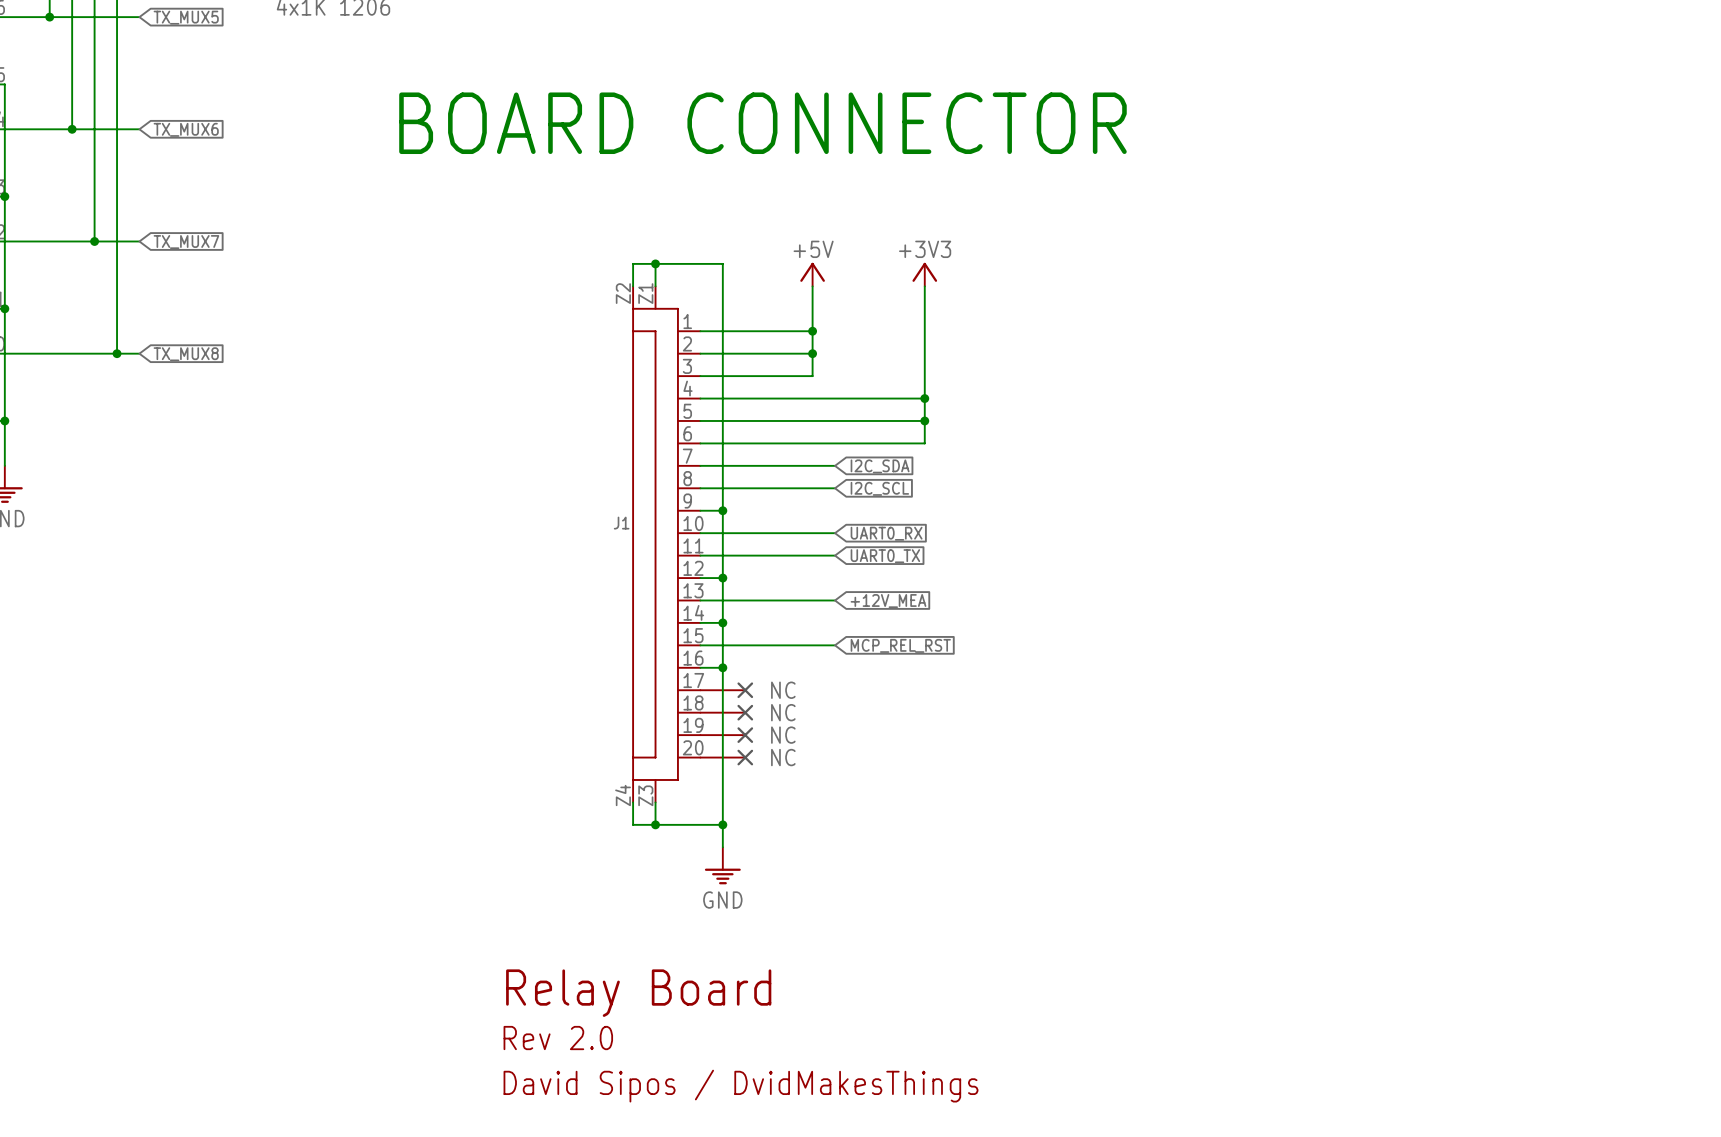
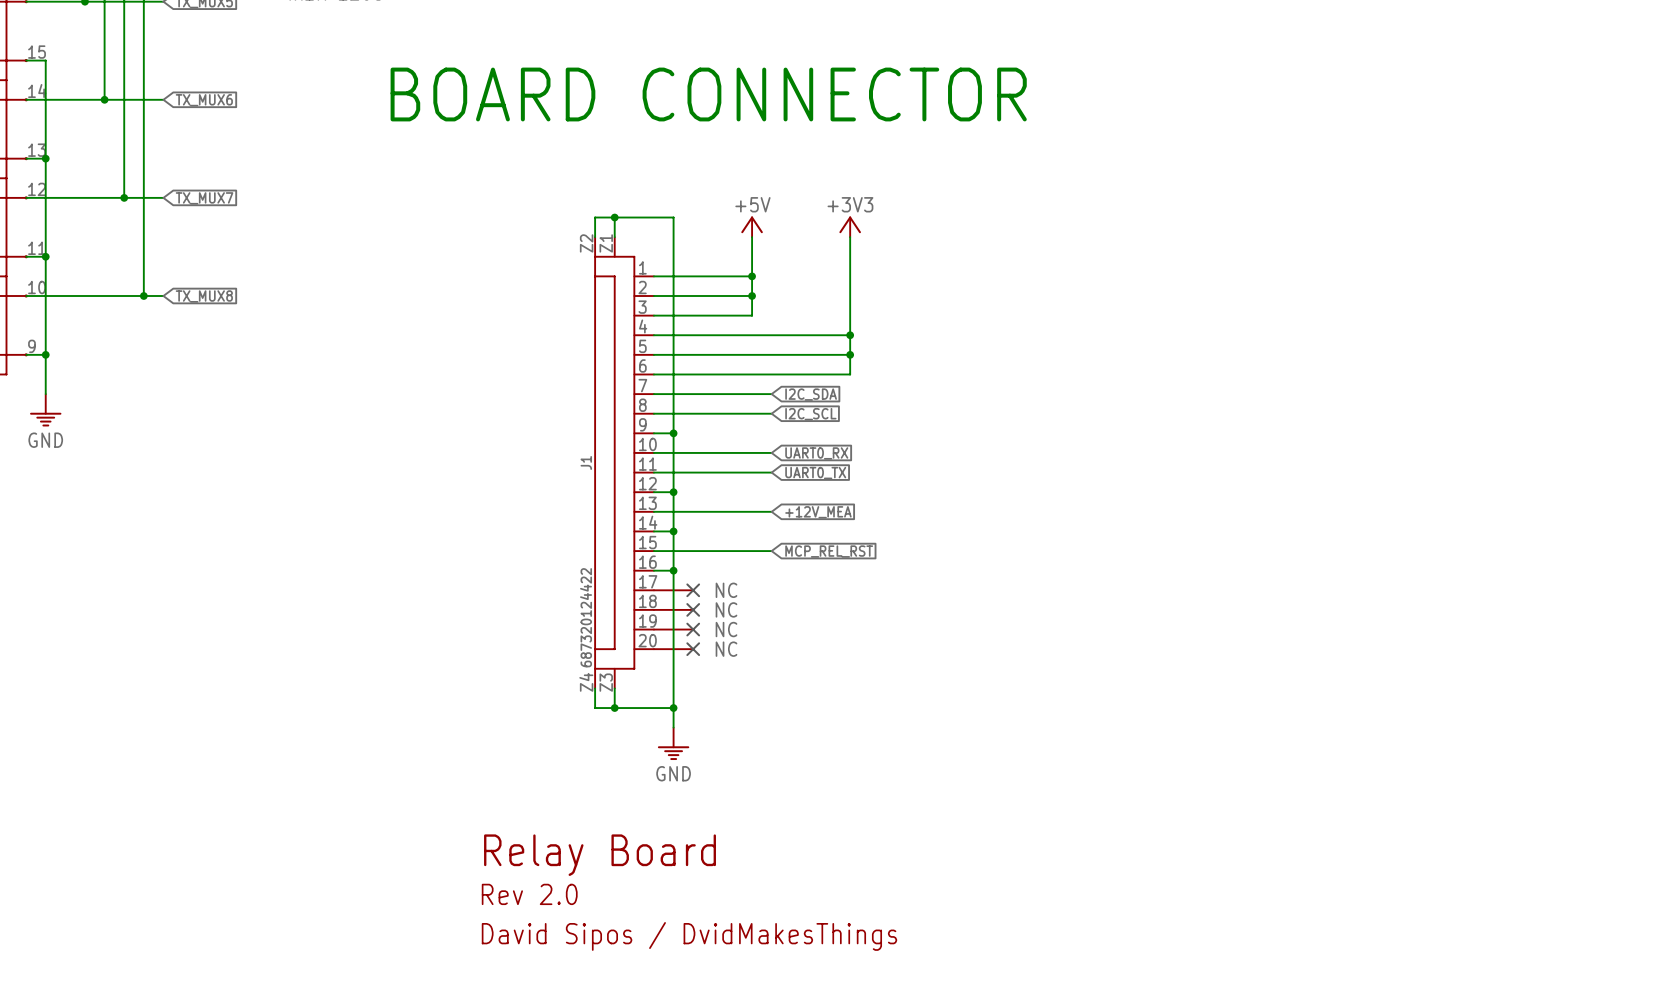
J1 name rotation: 0° (621, 523) -> 90° counterclockwise (586, 462)
J1 value: none -> 687320124422 (586, 617)

